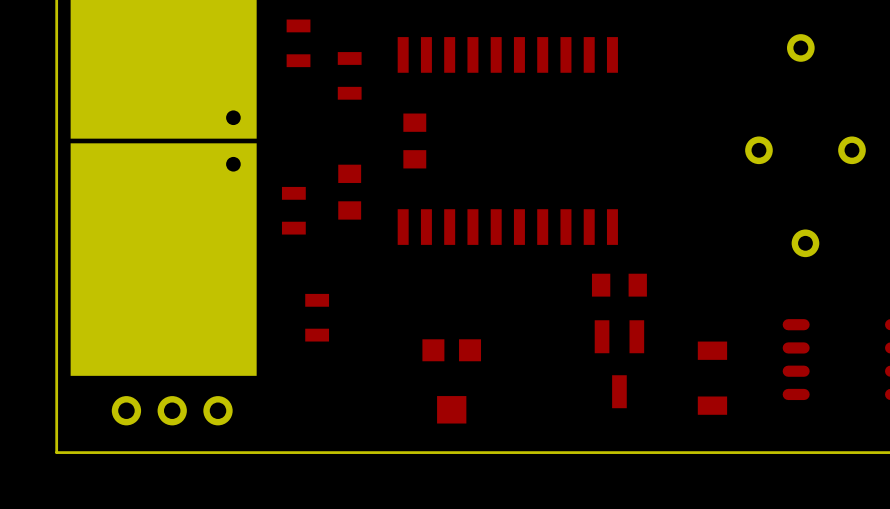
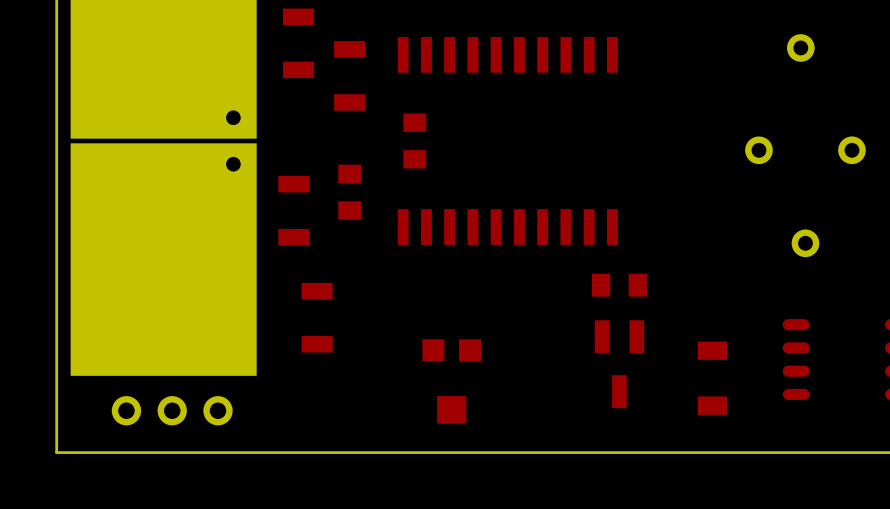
part footprint: [286, 19, 311, 68] -> [282, 8, 315, 79]
part footprint: [337, 52, 362, 100] -> [334, 41, 366, 111]
part footprint: [281, 186, 306, 235] -> [278, 175, 310, 246]
part footprint: [305, 293, 330, 342] -> [301, 282, 333, 353]

